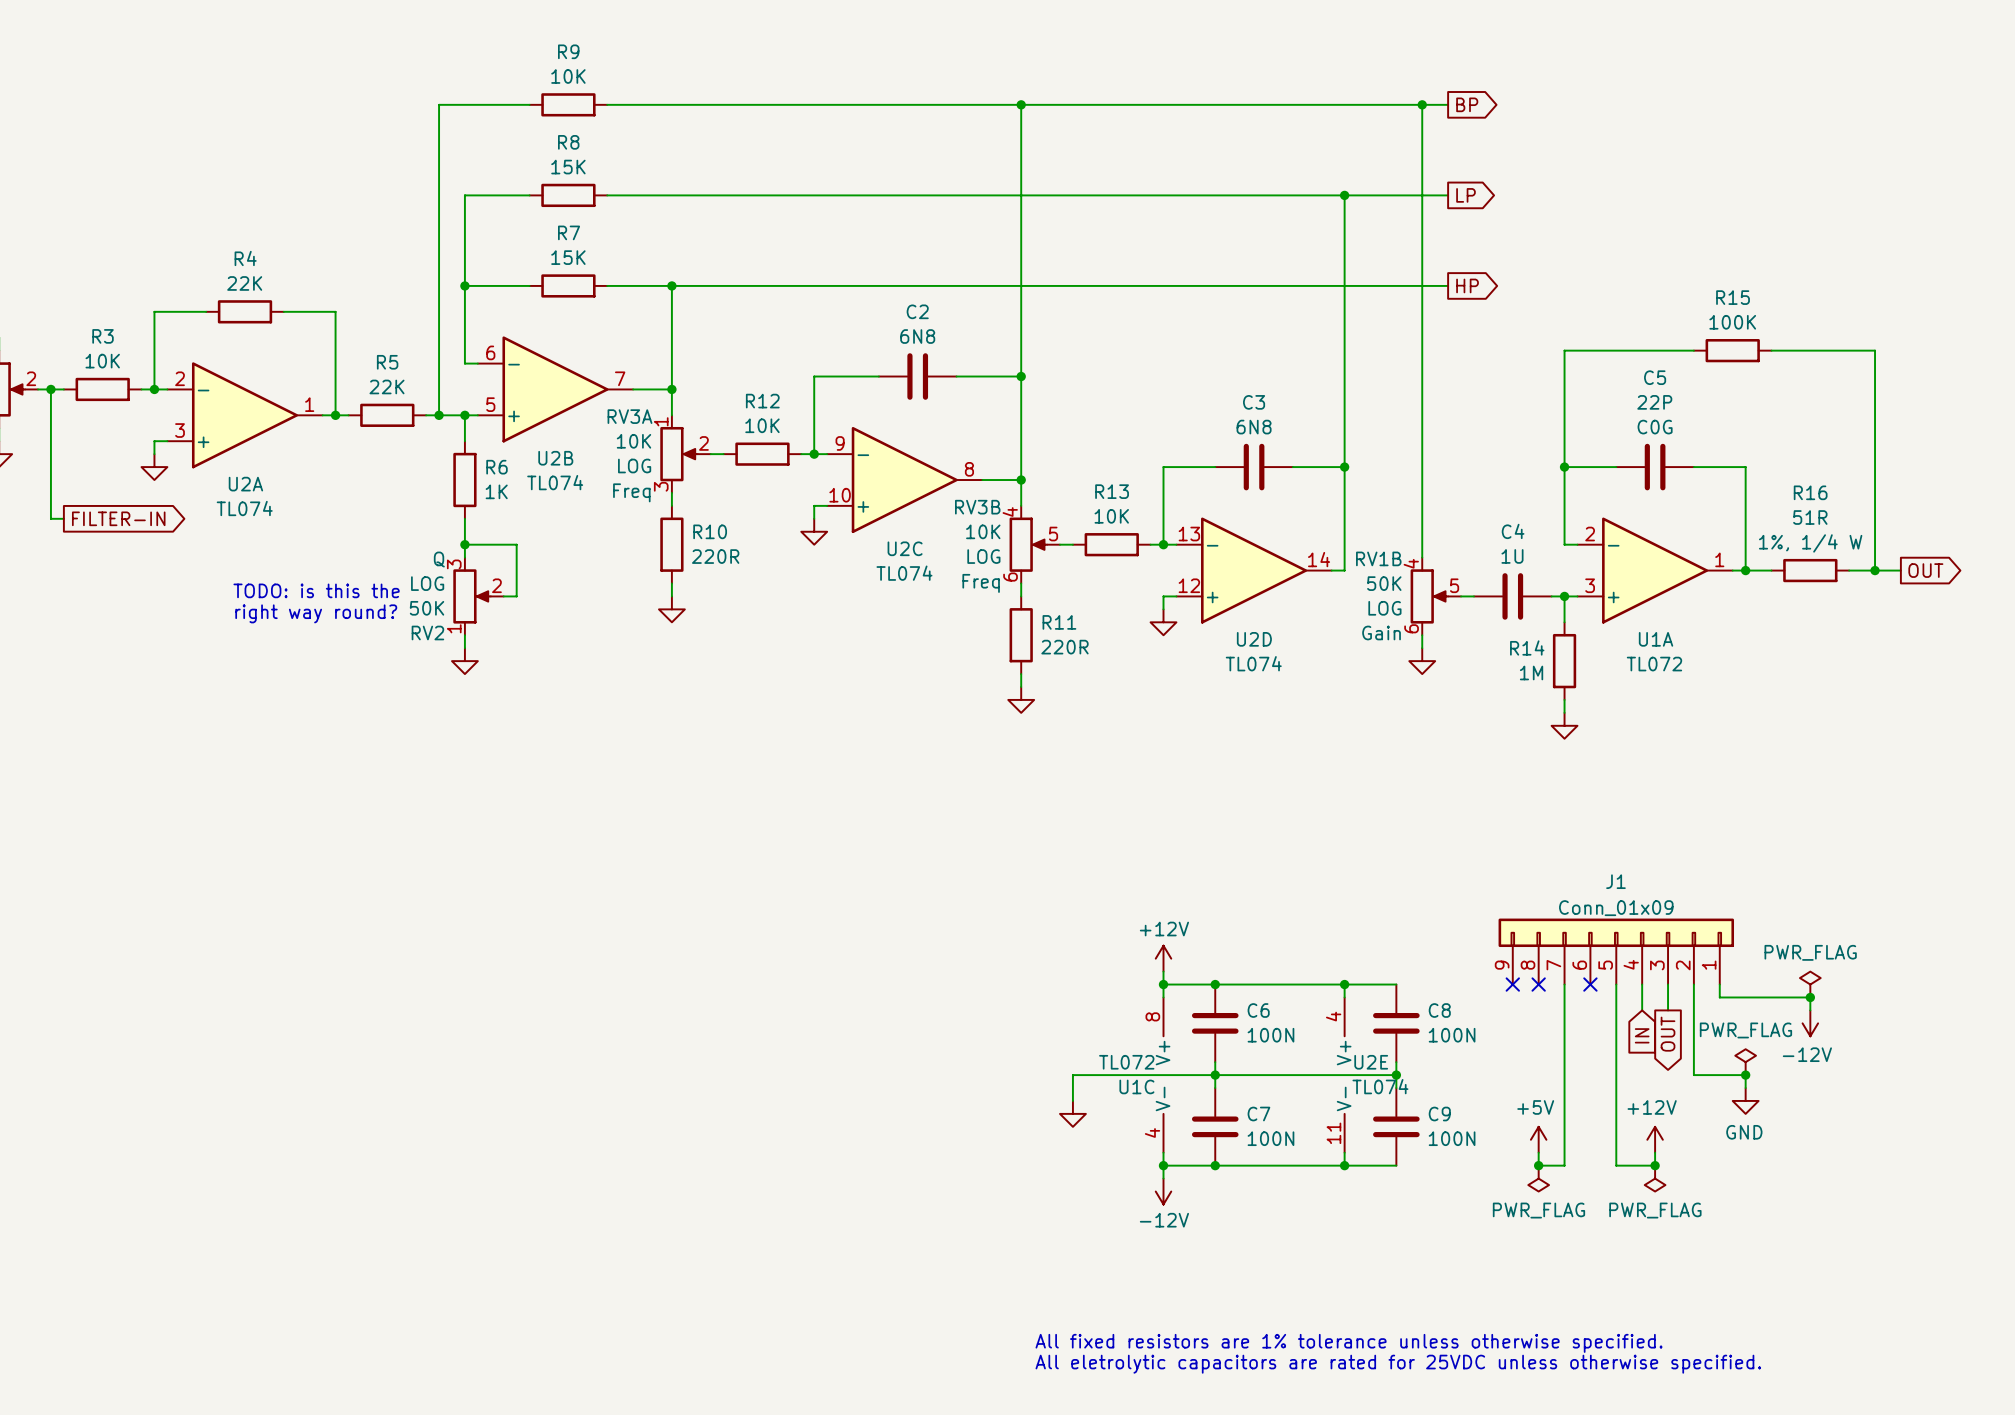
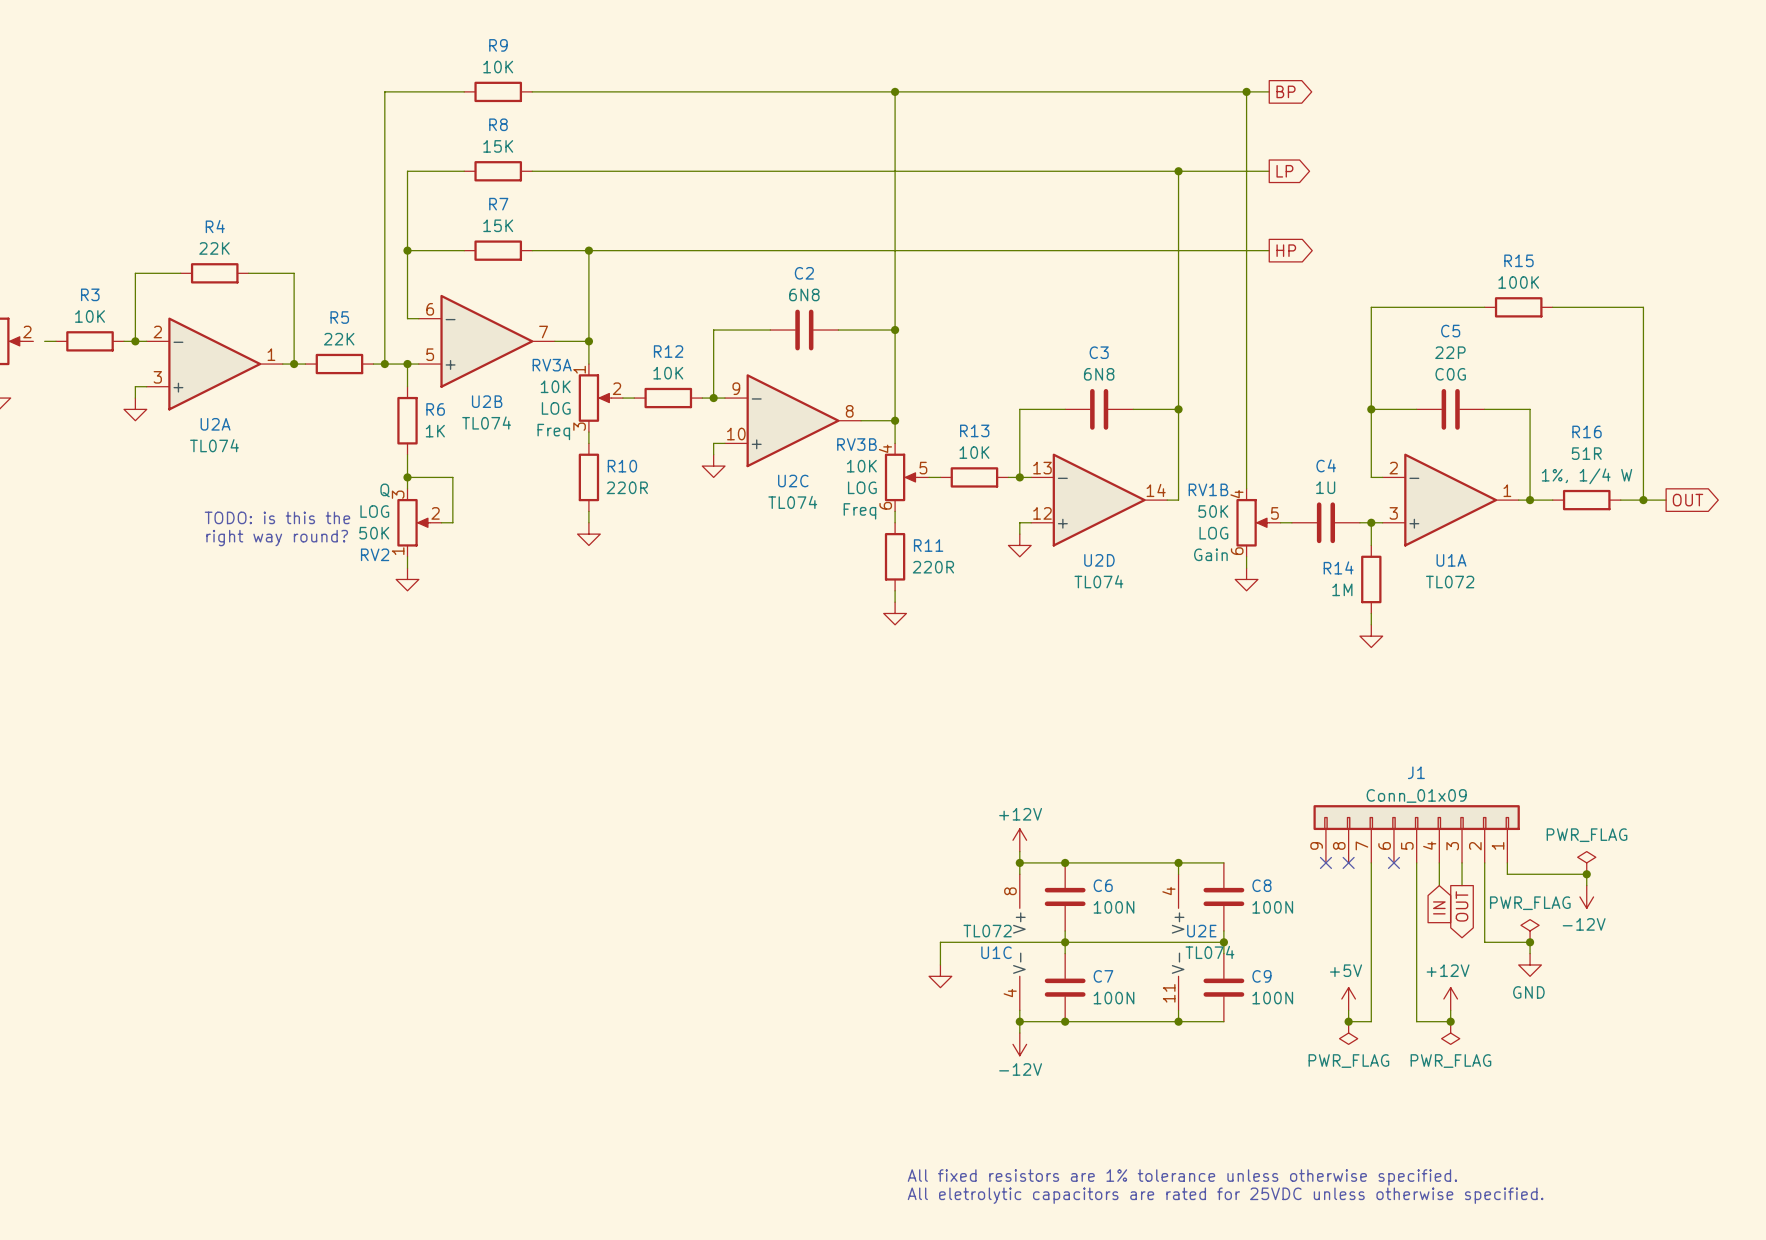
wire: (38, 389) (50, 389) (50, 518) (63, 518) -> none
junction: (50, 389) -> none
global label: FILTER-IN (118, 518) -> none

